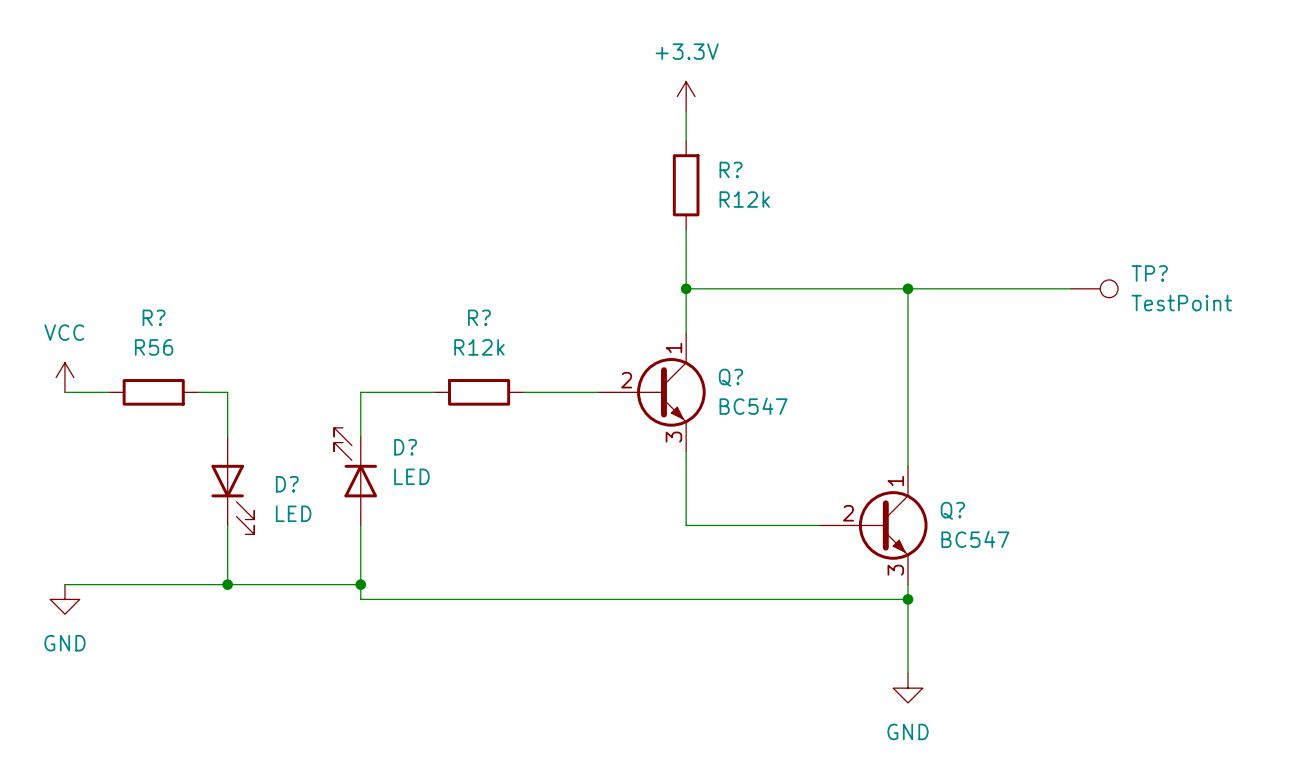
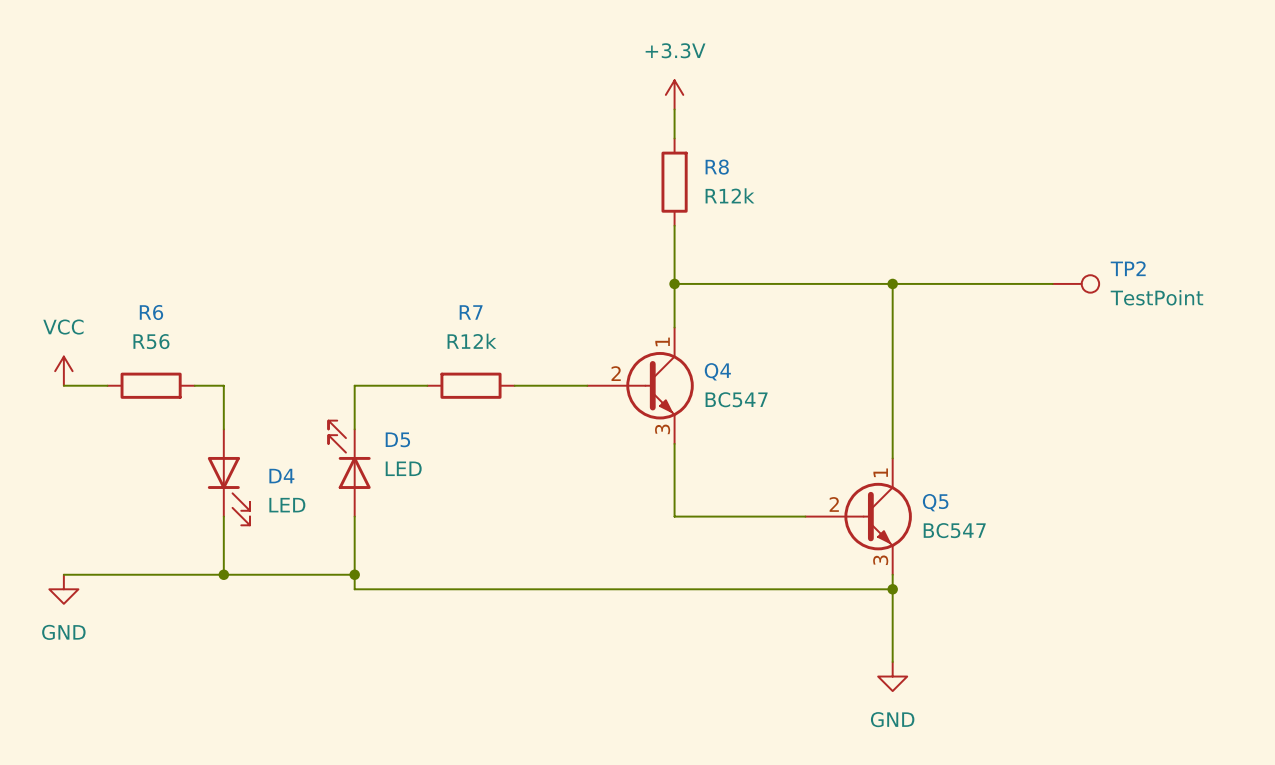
R? name: R? (730, 169) -> R8 (717, 167)
TP? name: TP? (1149, 273) -> TP2 (1128, 268)
R? name: R? (154, 317) -> R6 (151, 312)
R? name: R? (479, 317) -> R7 (471, 312)
Q? name: Q? (730, 377) -> Q4 (717, 371)
D? name: D? (405, 447) -> D5 (397, 439)
D? name: D? (287, 484) -> D4 (281, 476)
Q? name: Q? (952, 510) -> Q5 (935, 502)

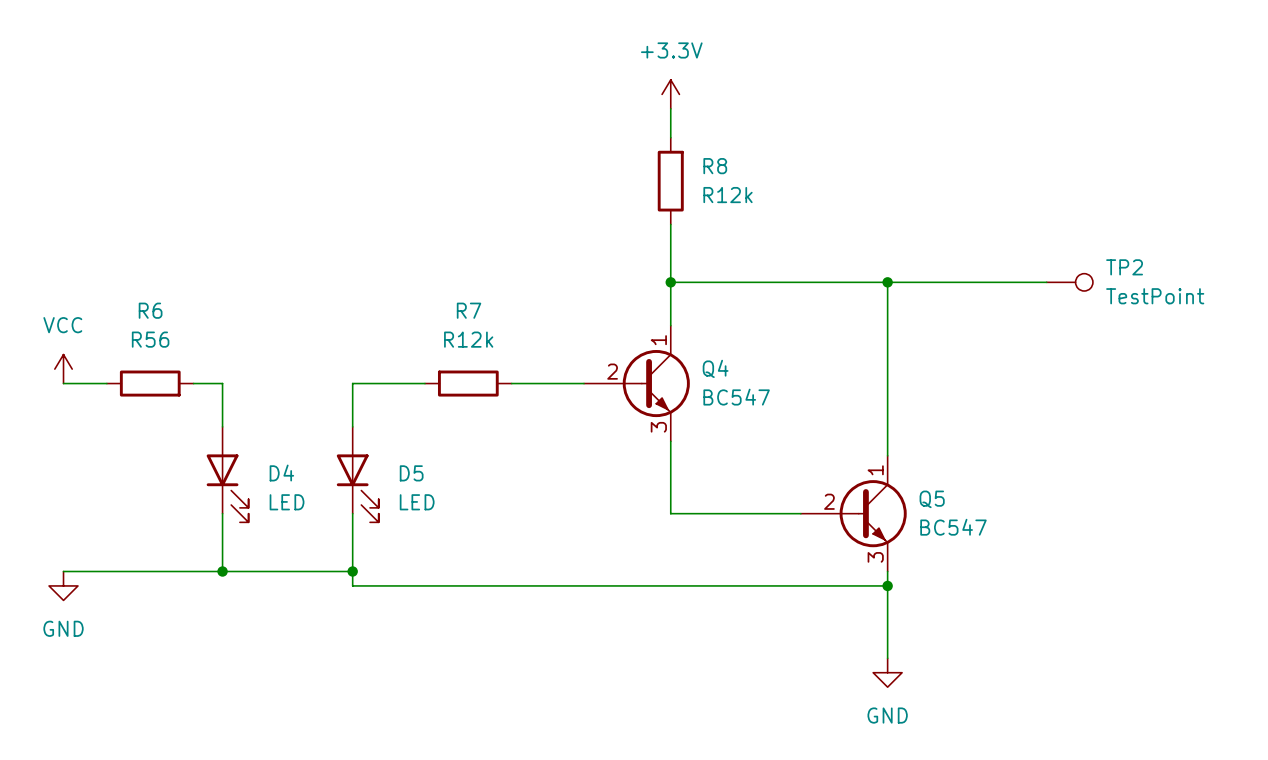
D5 name position: D5 (397, 439) -> D5 (411, 473)
D5 rotation: 0° (349, 454) -> 180° (357, 488)
D5 value position: LED (403, 468) -> LED (417, 502)

